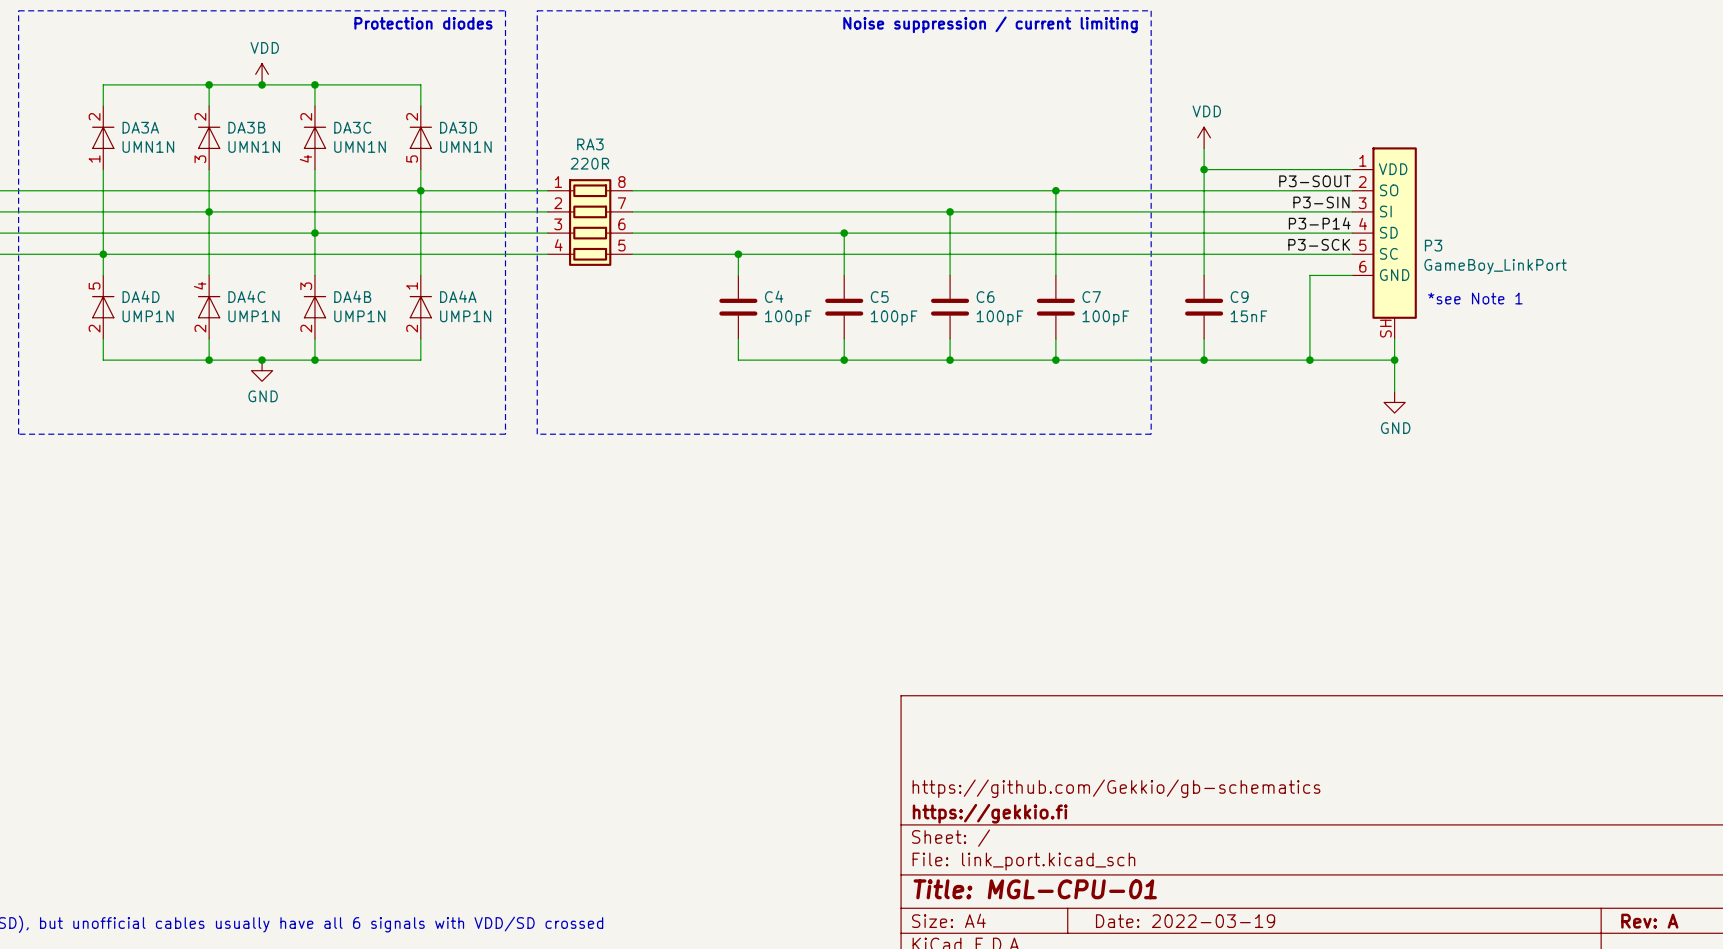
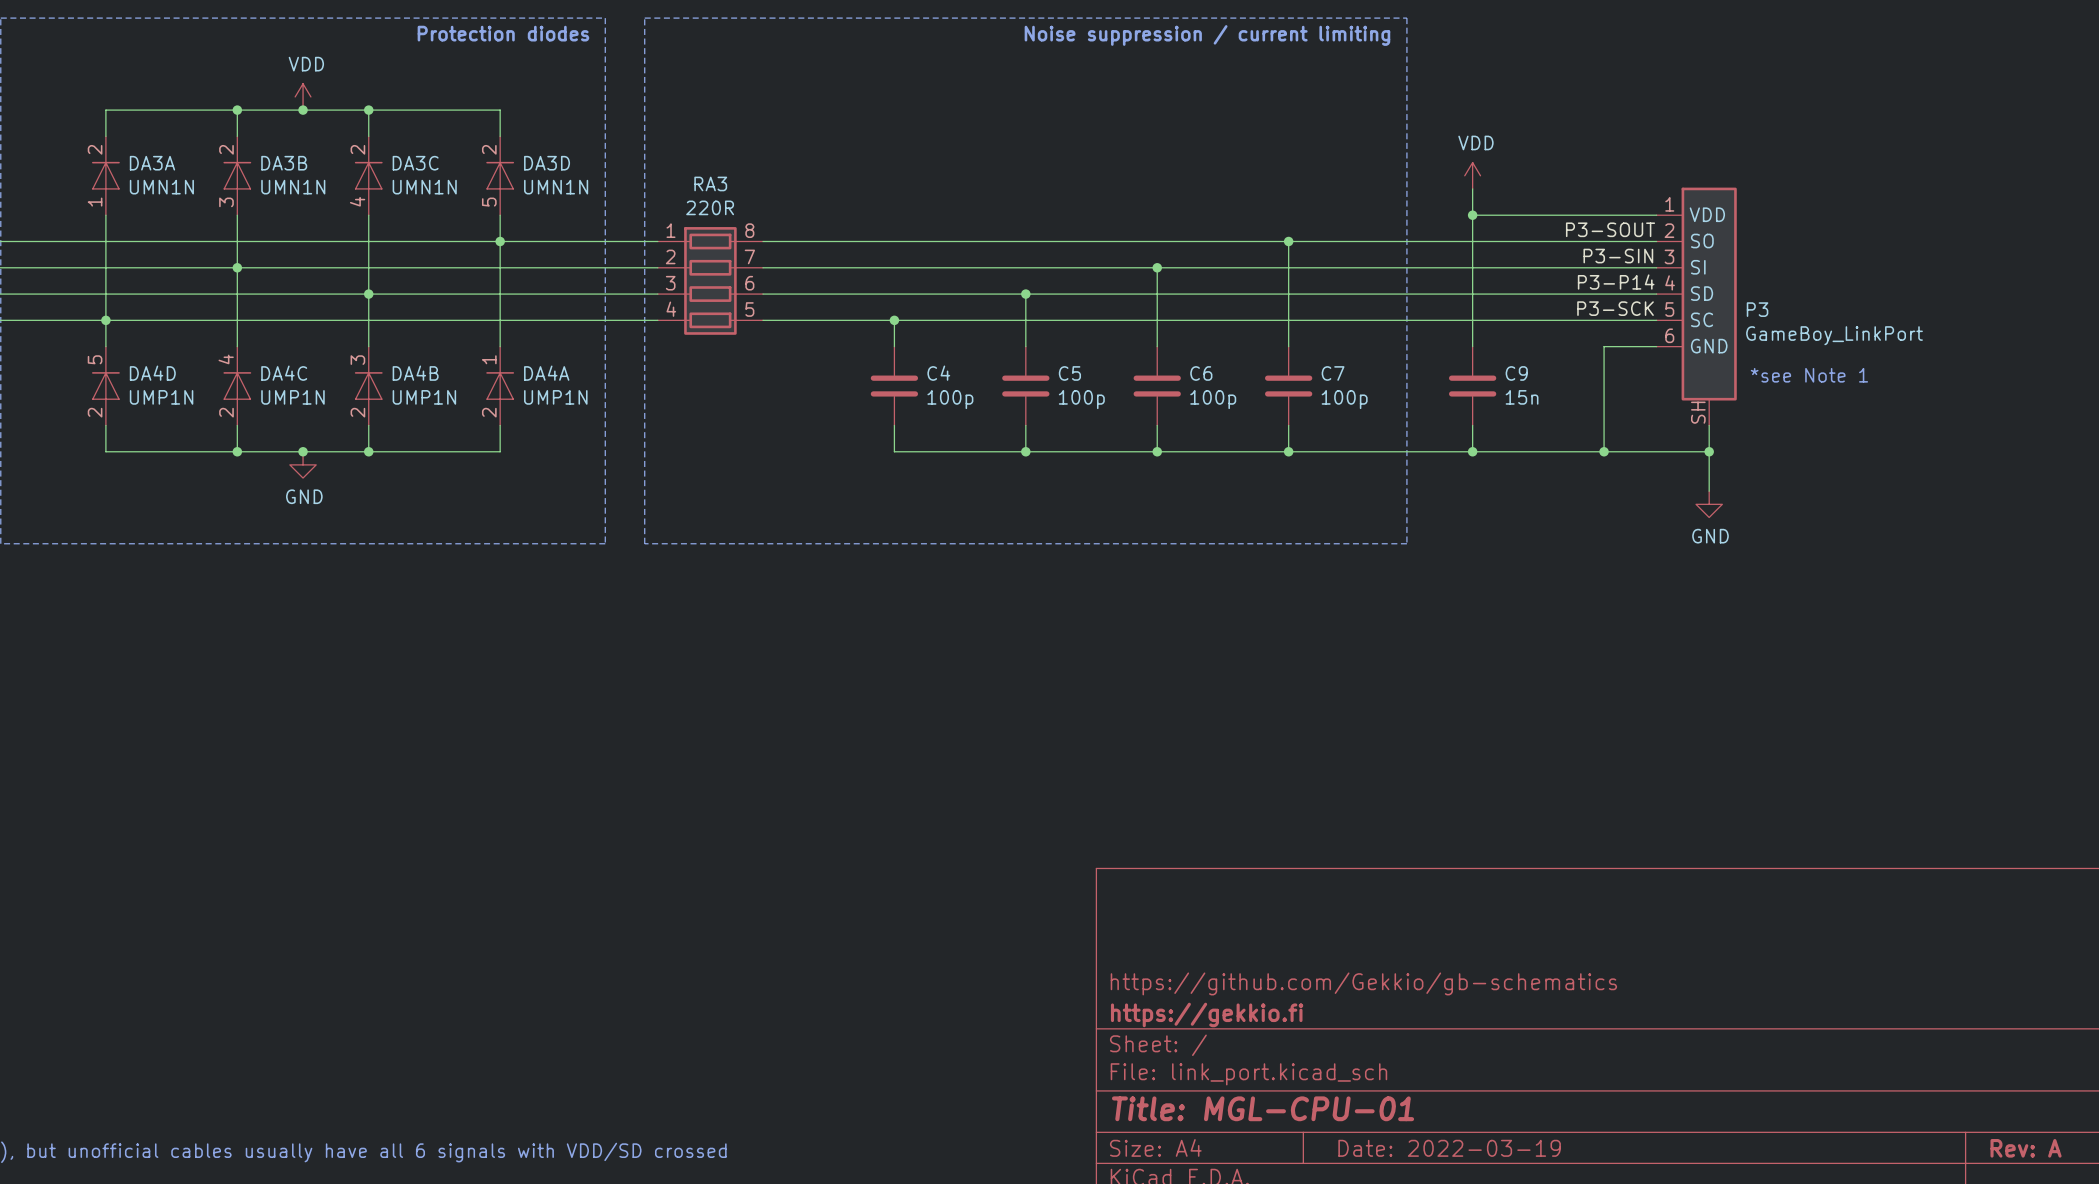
C9 value: 15nF (1248, 316) -> 15n (1522, 397)
C4 value: 100pF (788, 318) -> 100p (950, 399)
C5 value: 100pF (894, 318) -> 100p (1081, 399)
C6 value: 100pF (999, 318) -> 100p (1213, 399)
C7 value: 100pF (1105, 318) -> 100p (1344, 399)

